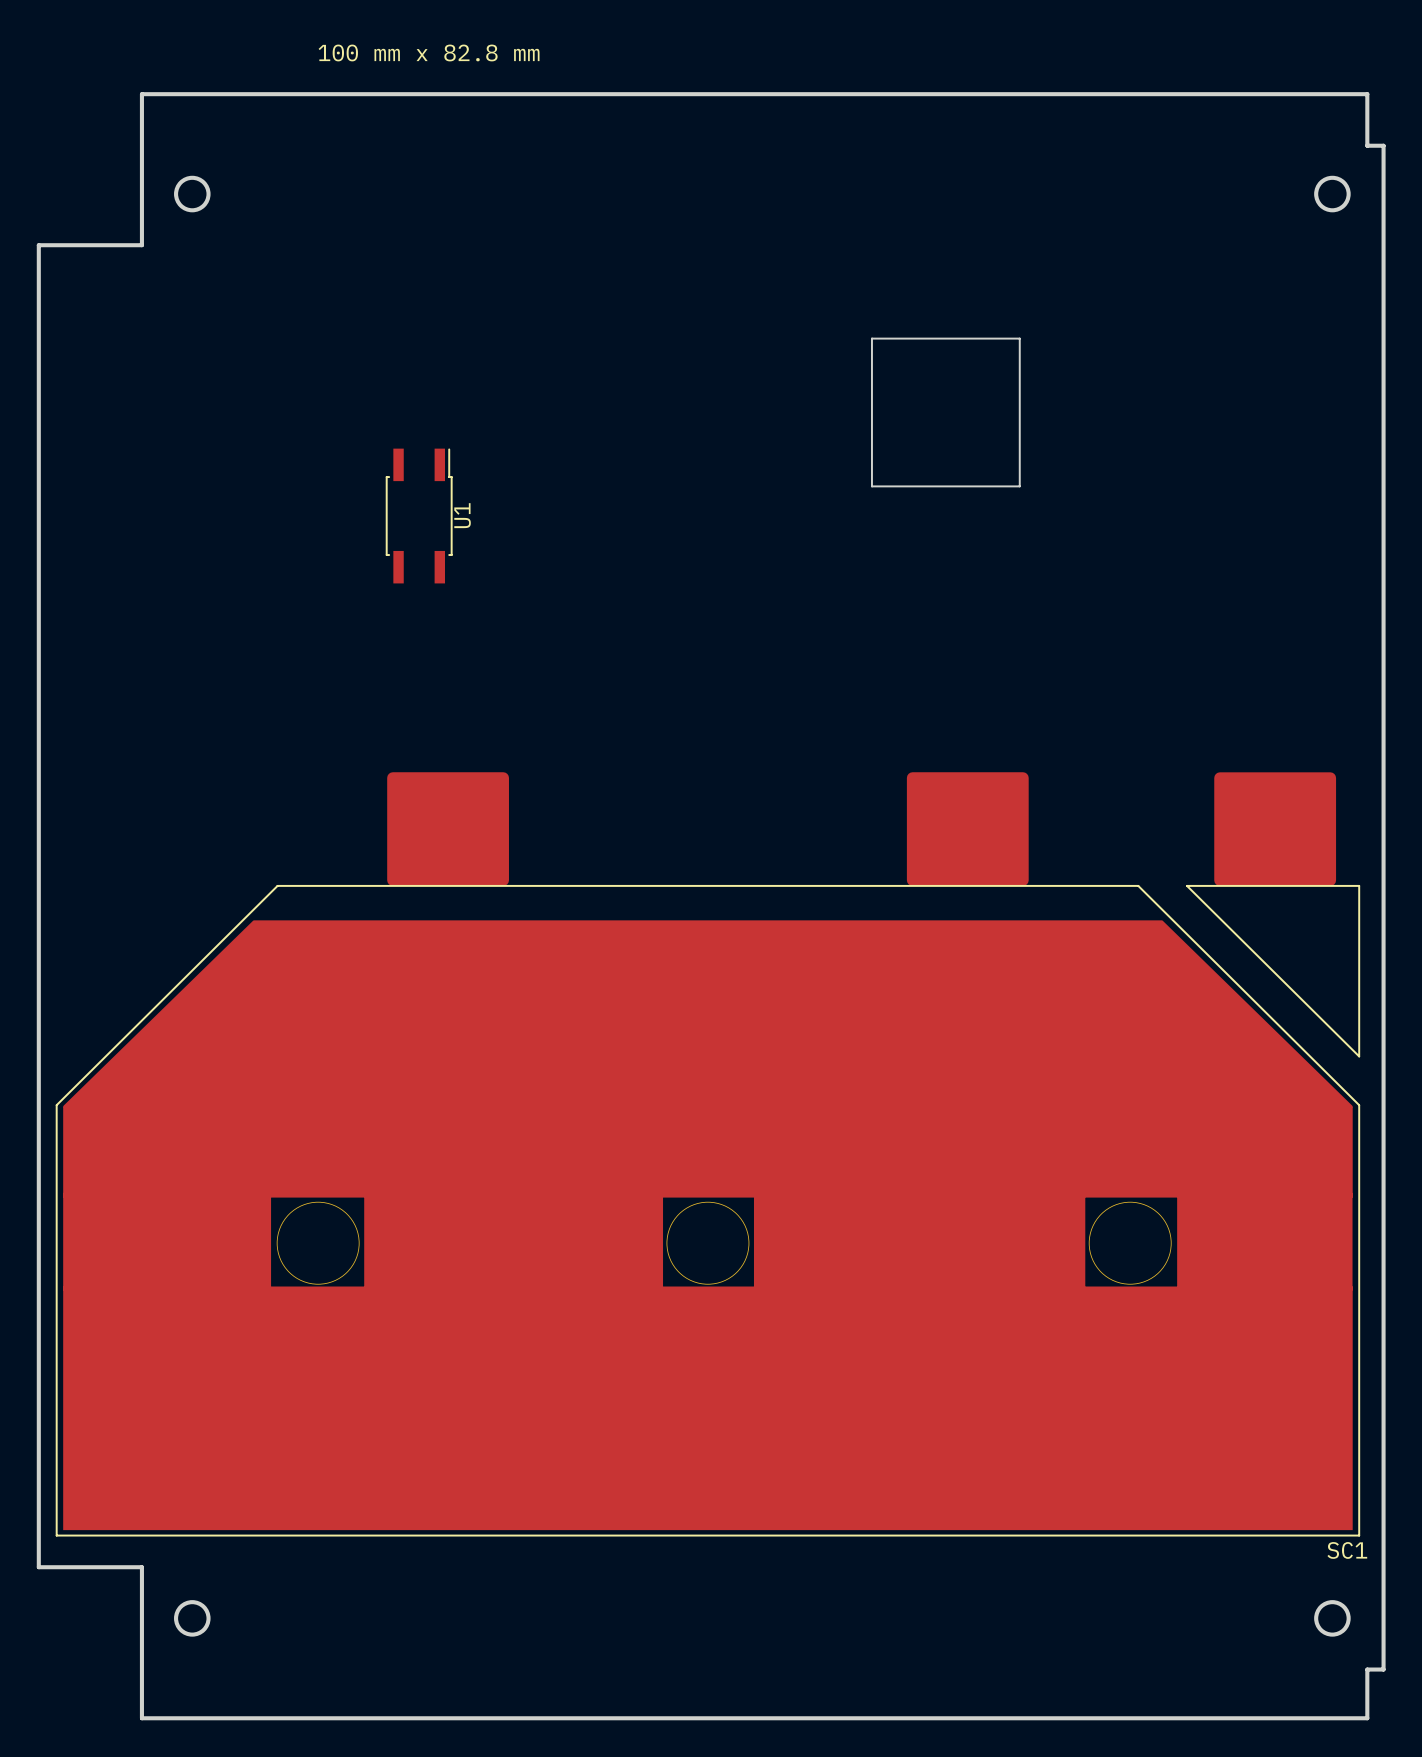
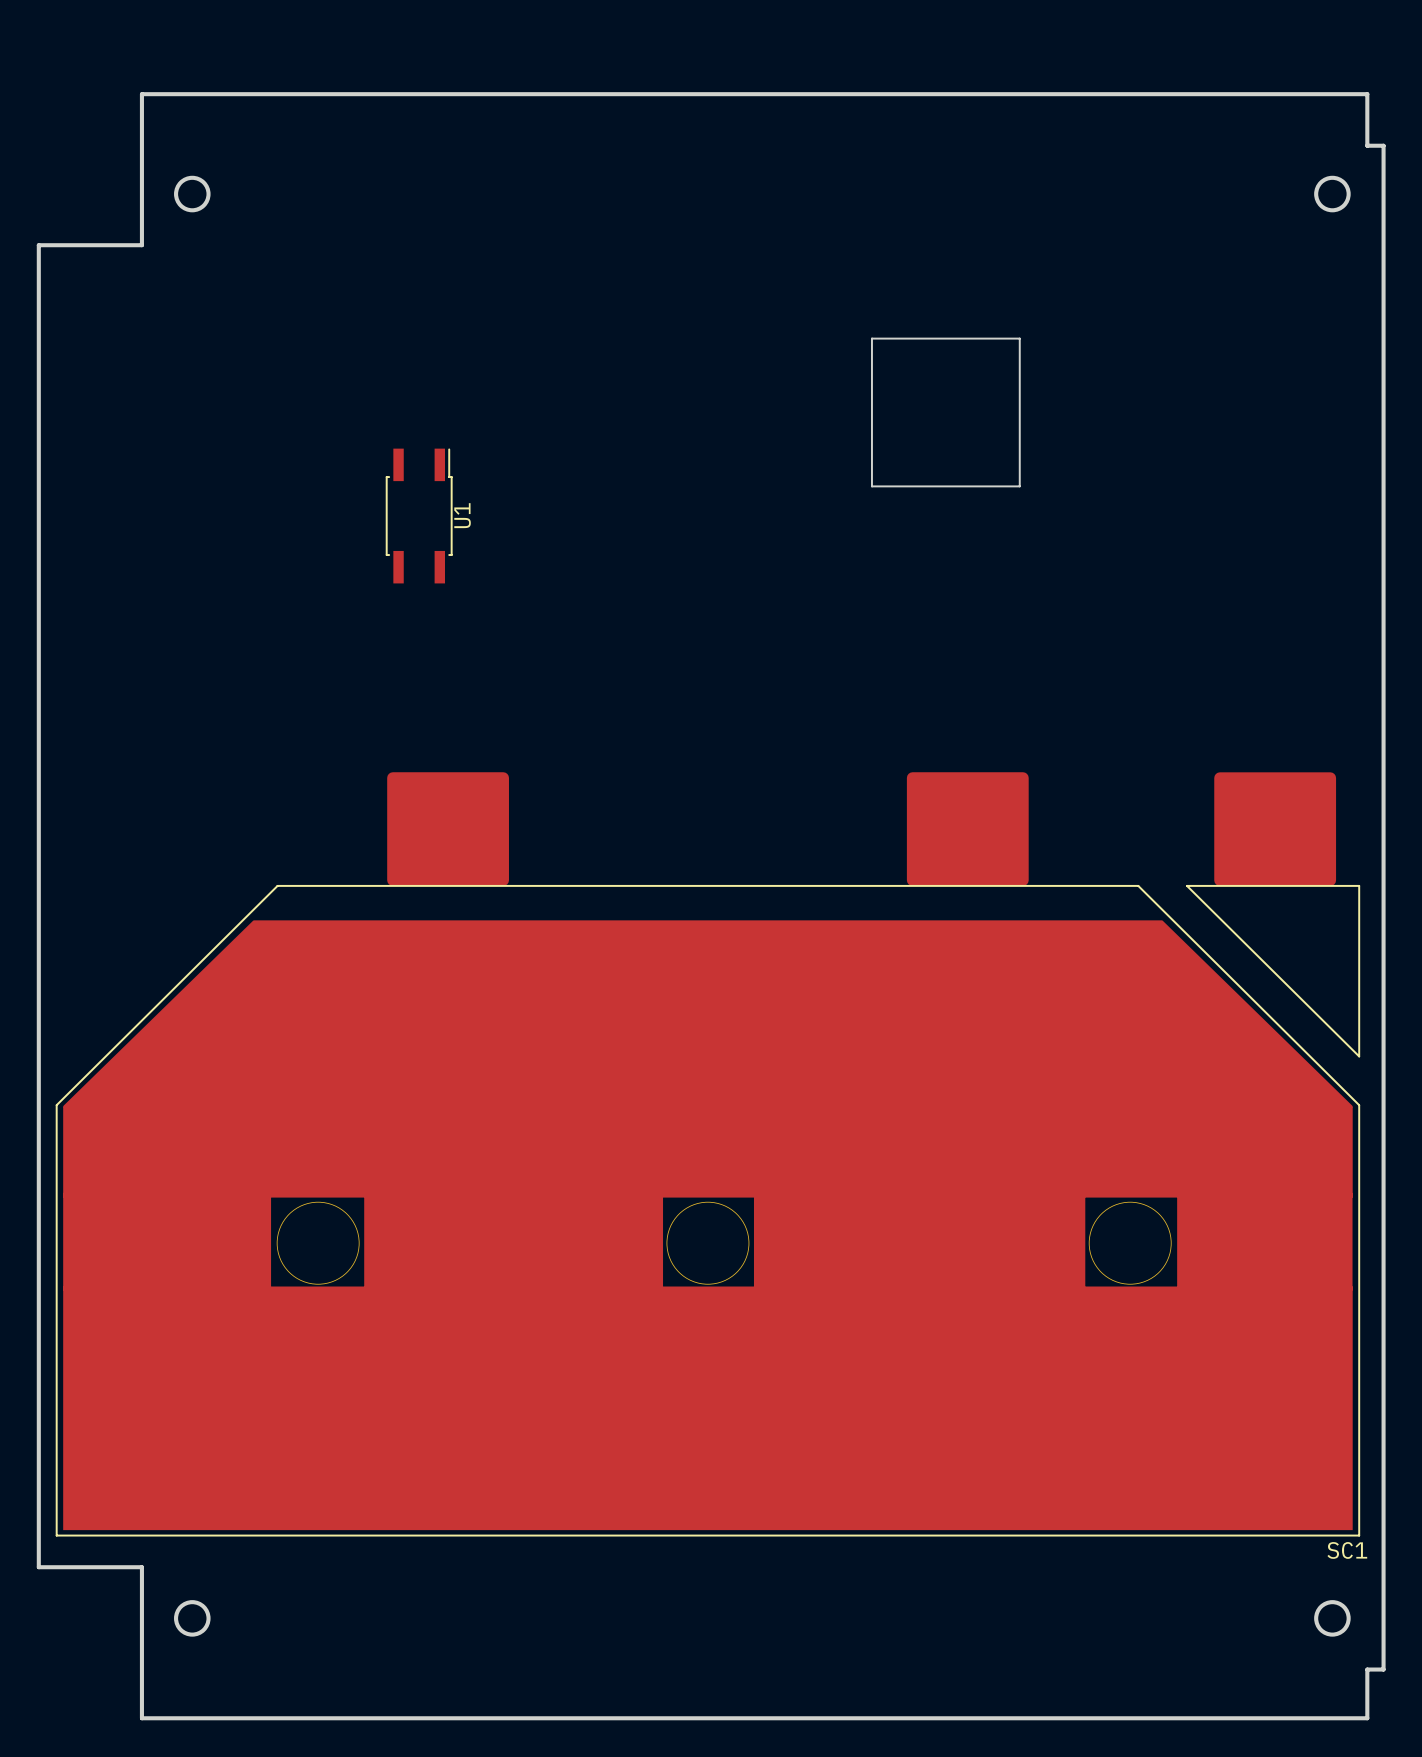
text: 100 mm x 82.8 mm (429, 52) -> none

